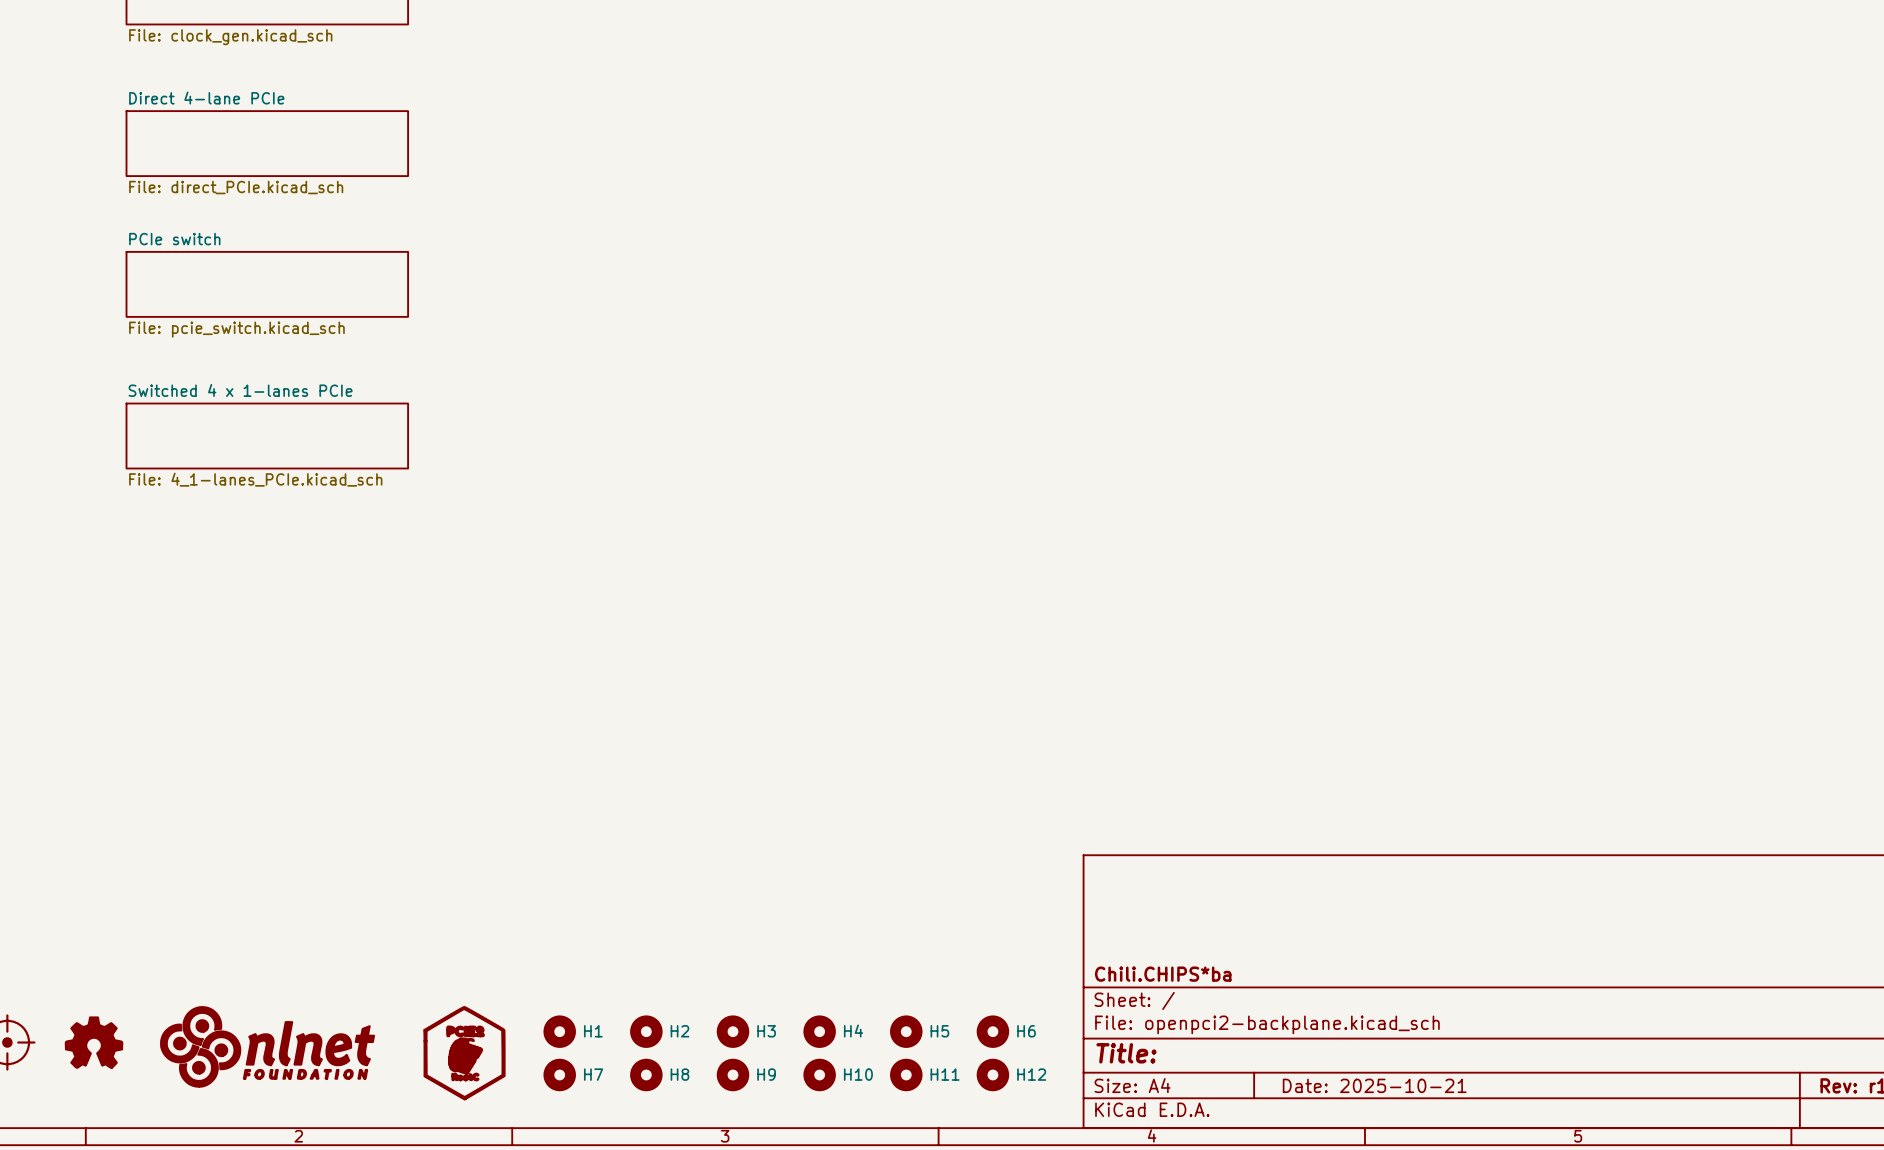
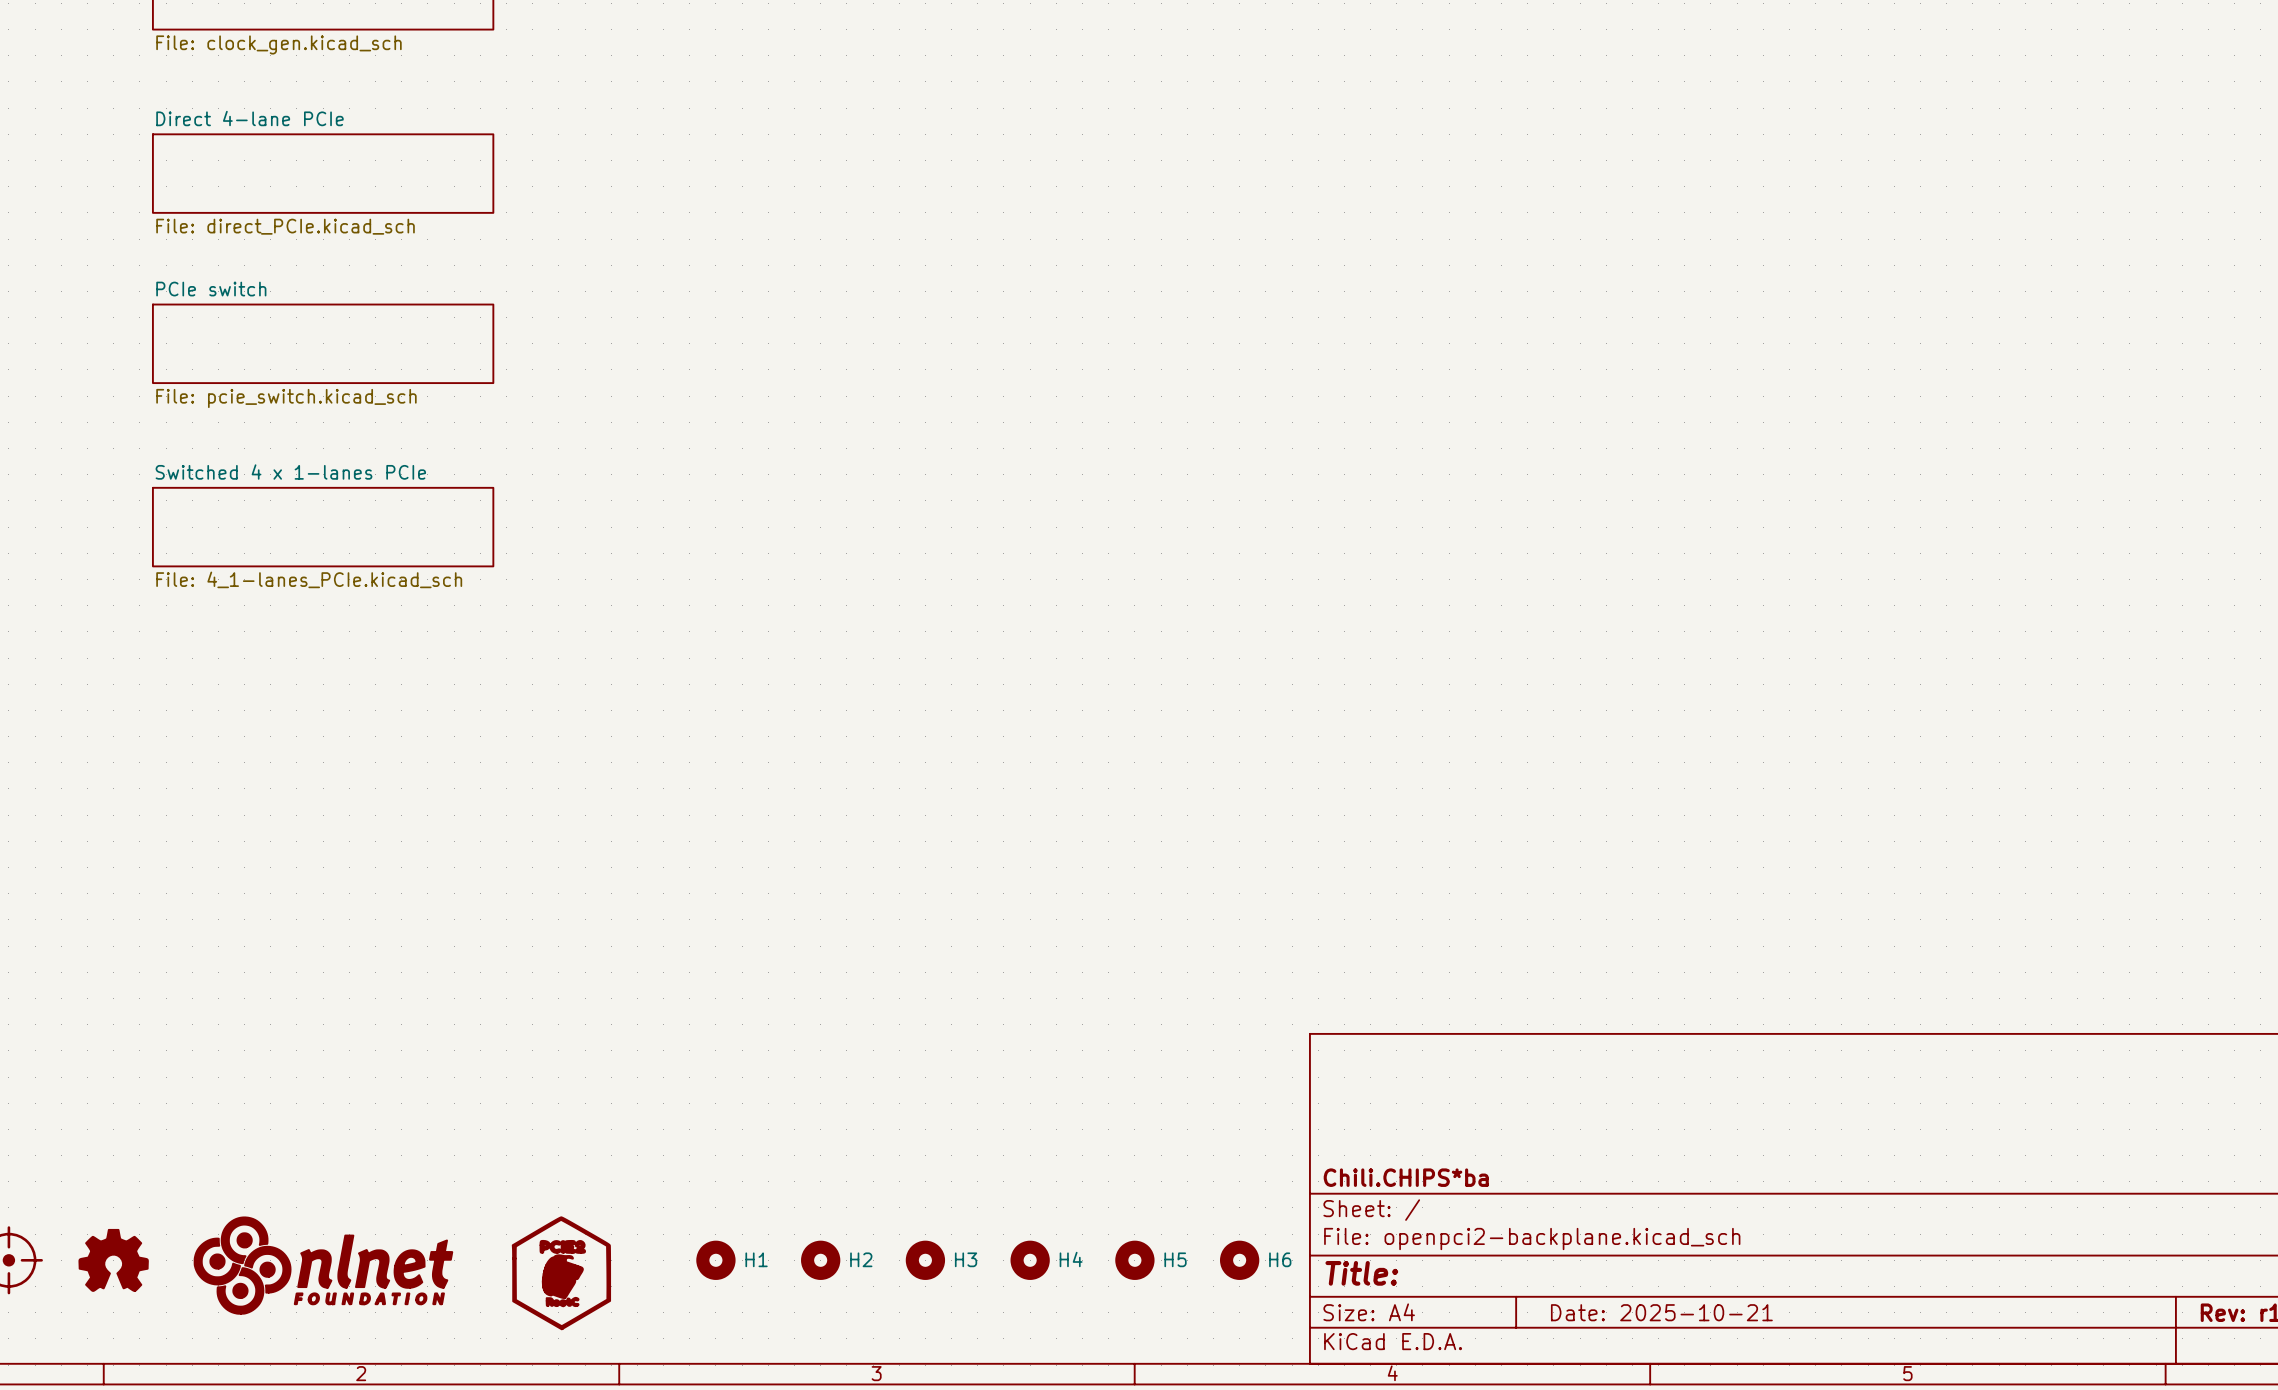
H1 position: (559, 1031) -> (715, 1260)
H2 position: (646, 1031) -> (820, 1260)
H3 position: (732, 1031) -> (925, 1260)
H4 position: (819, 1031) -> (1030, 1260)
H5 position: (906, 1031) -> (1134, 1260)
H6 position: (992, 1031) -> (1239, 1260)
H7: (559, 1074) -> none
H8: (646, 1074) -> none
H9: (732, 1074) -> none
H10: (819, 1074) -> none
H11: (906, 1074) -> none
H12: (992, 1074) -> none

